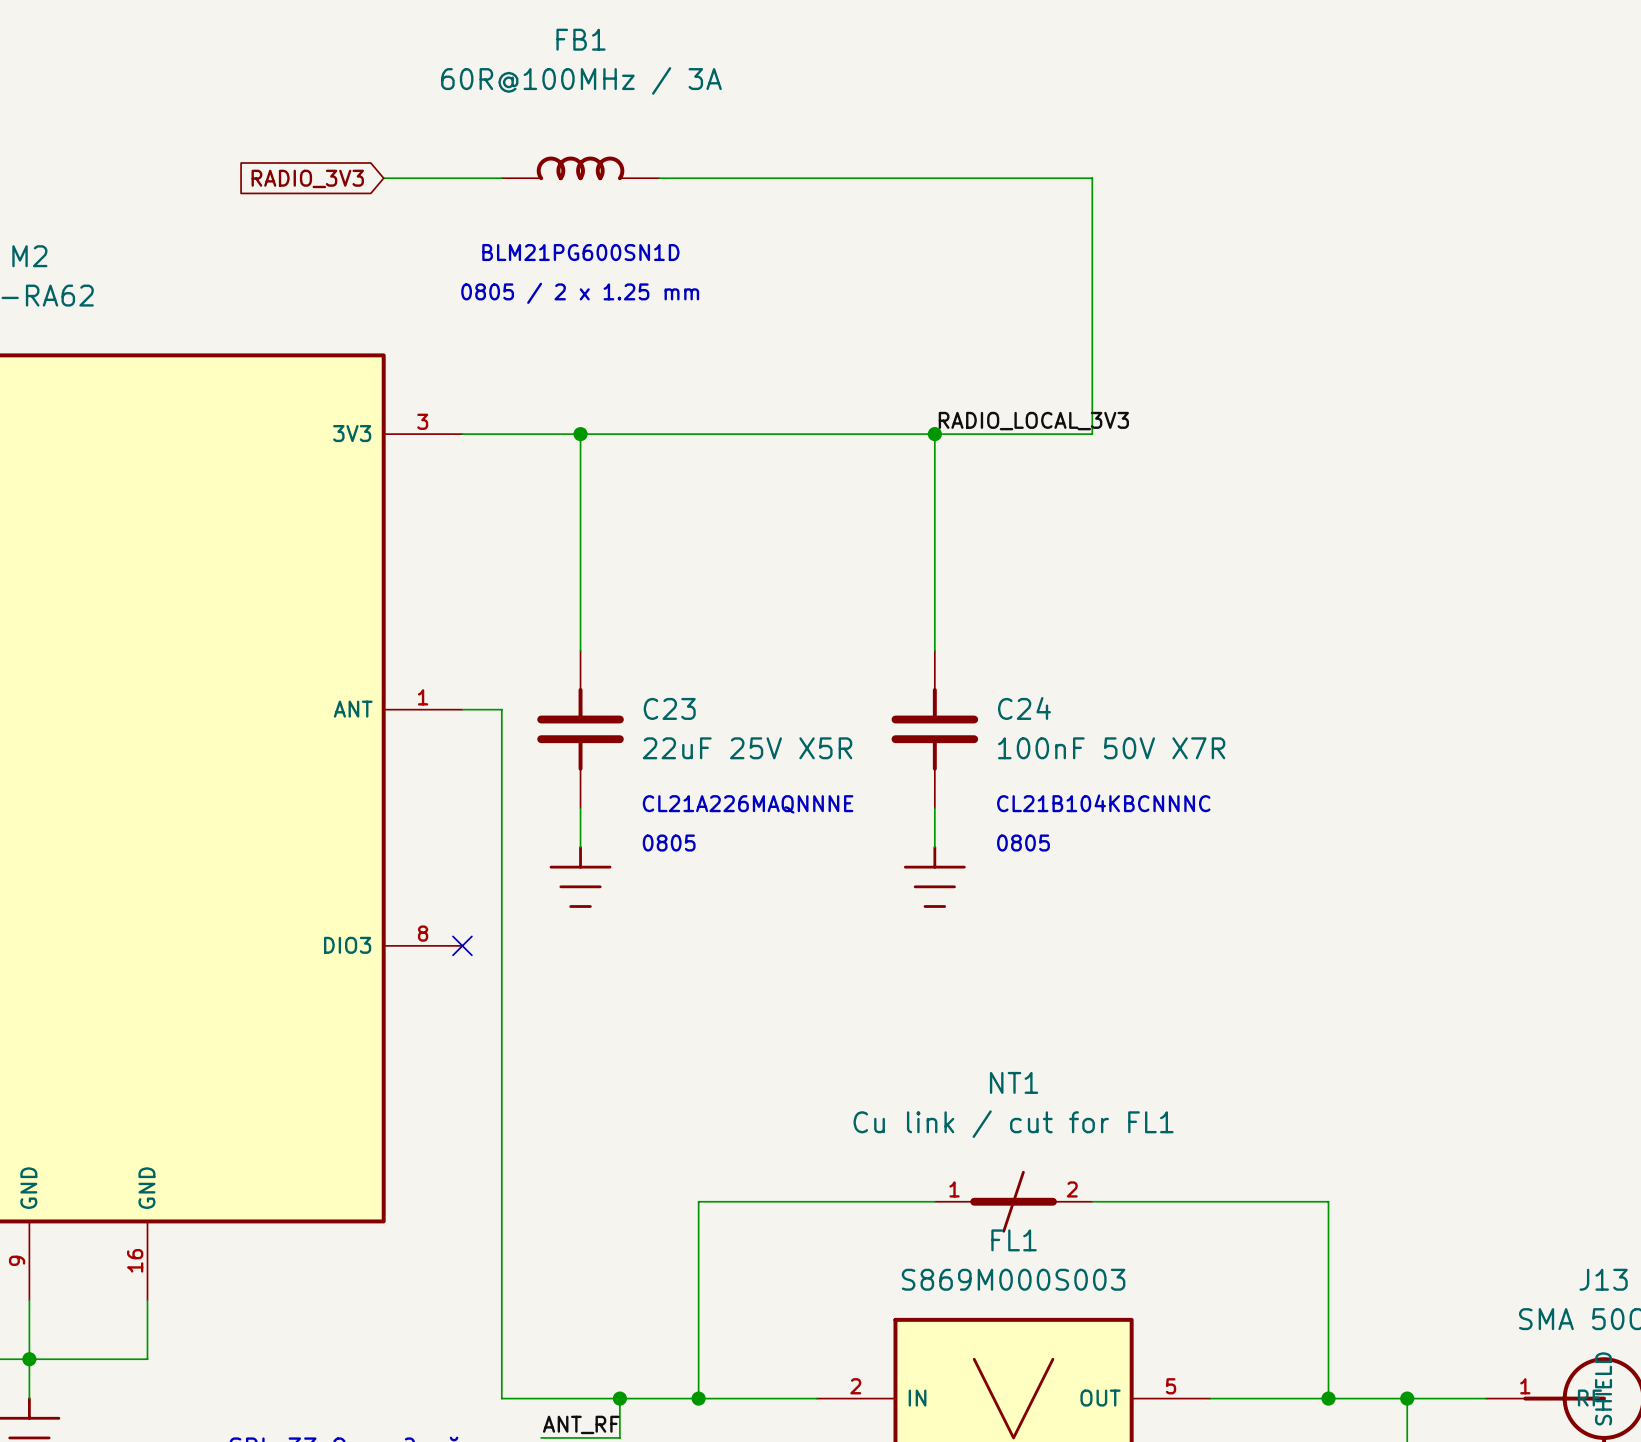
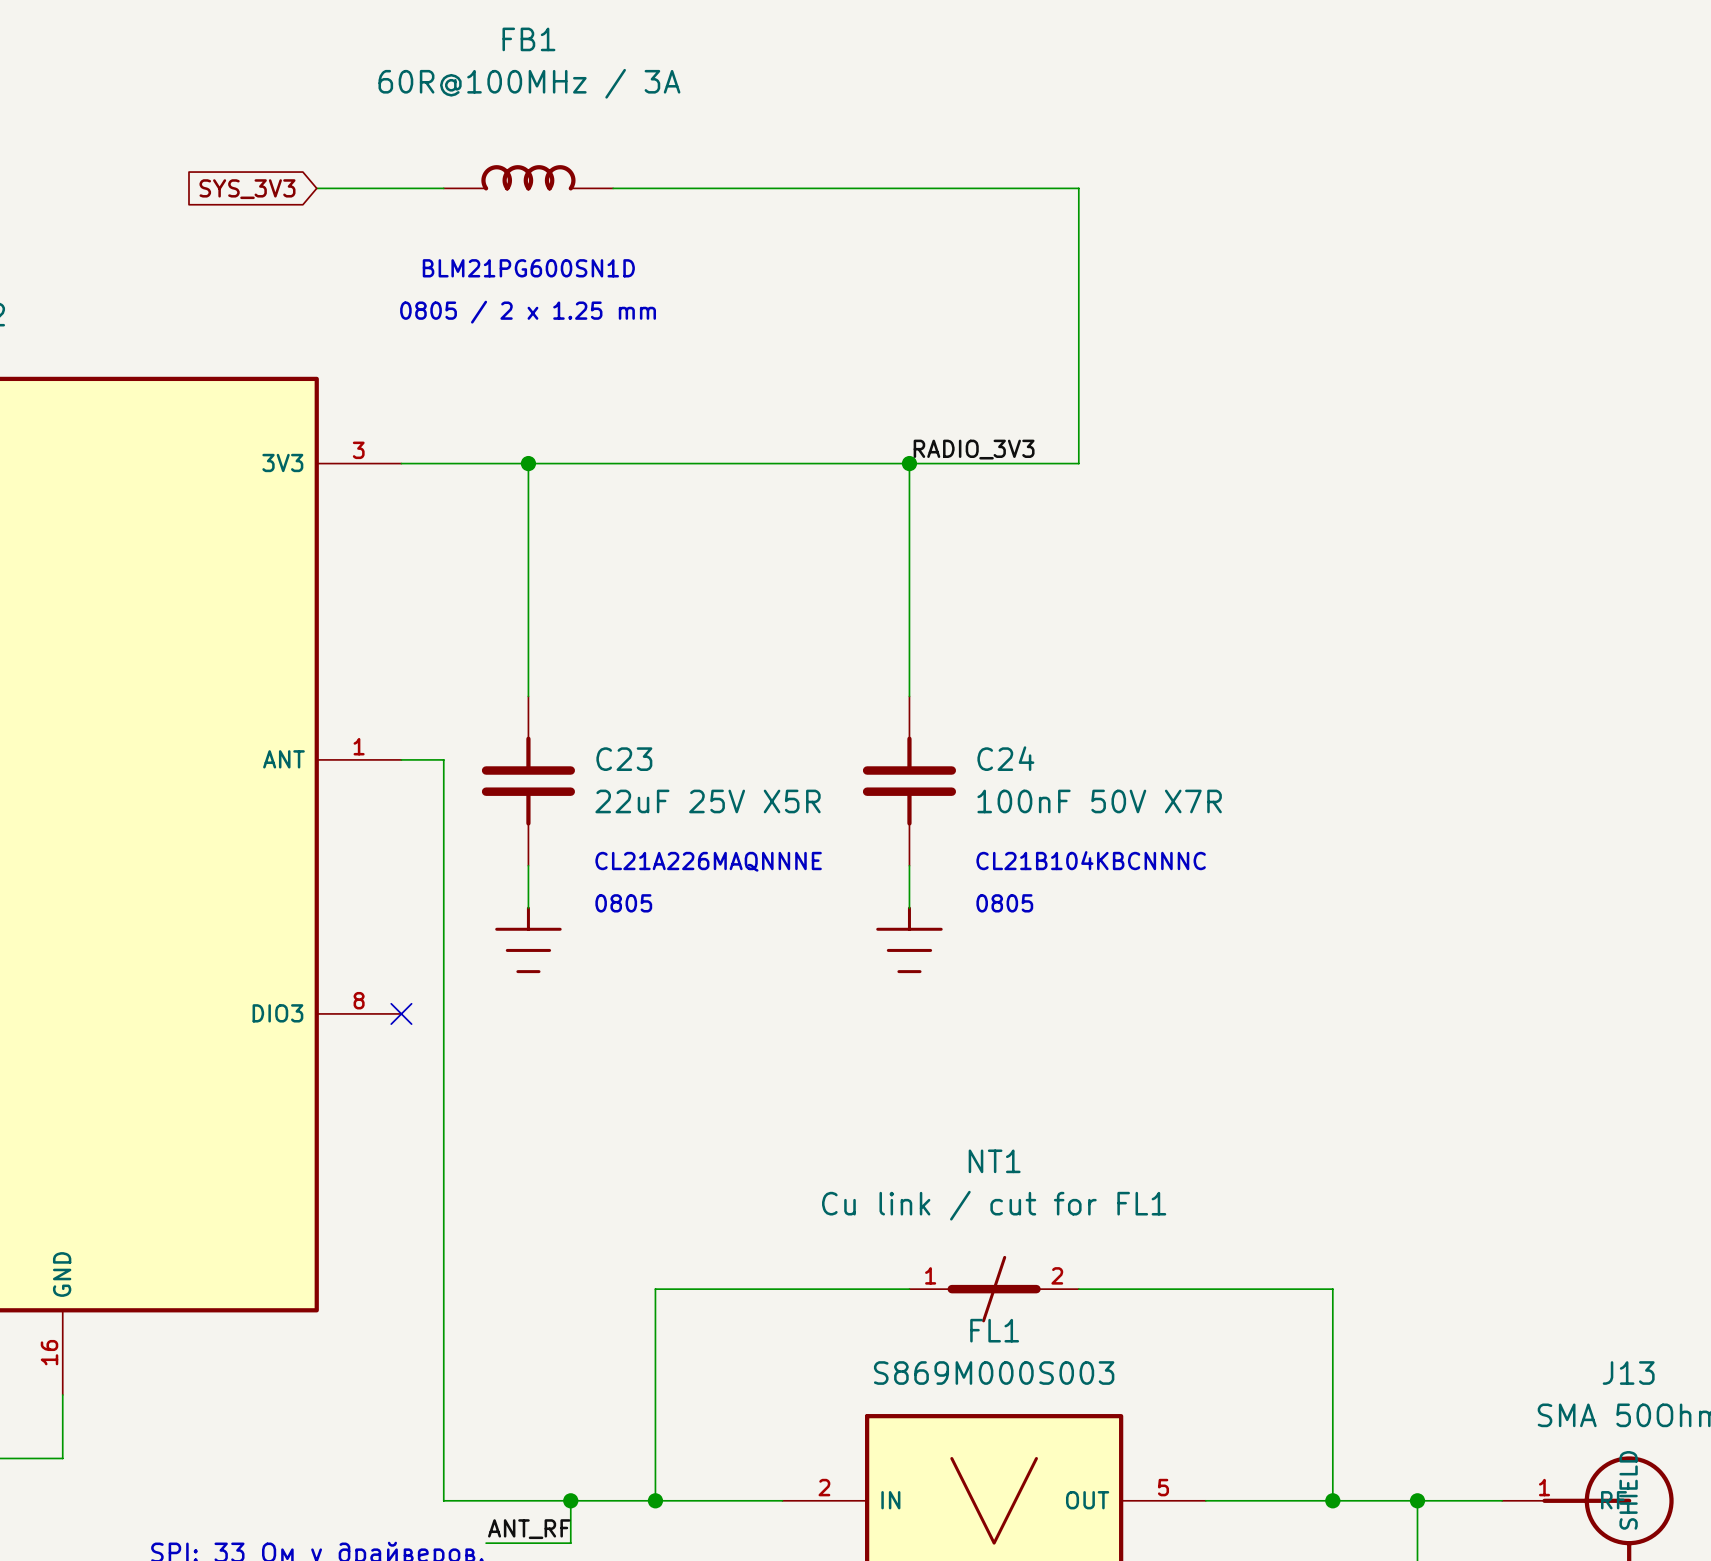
global label: RADIO_3V3 (307, 178) -> SYS_3V3 (247, 189)
label: RADIO_LOCAL_3V3 (1033, 421) -> RADIO_3V3 (974, 449)

